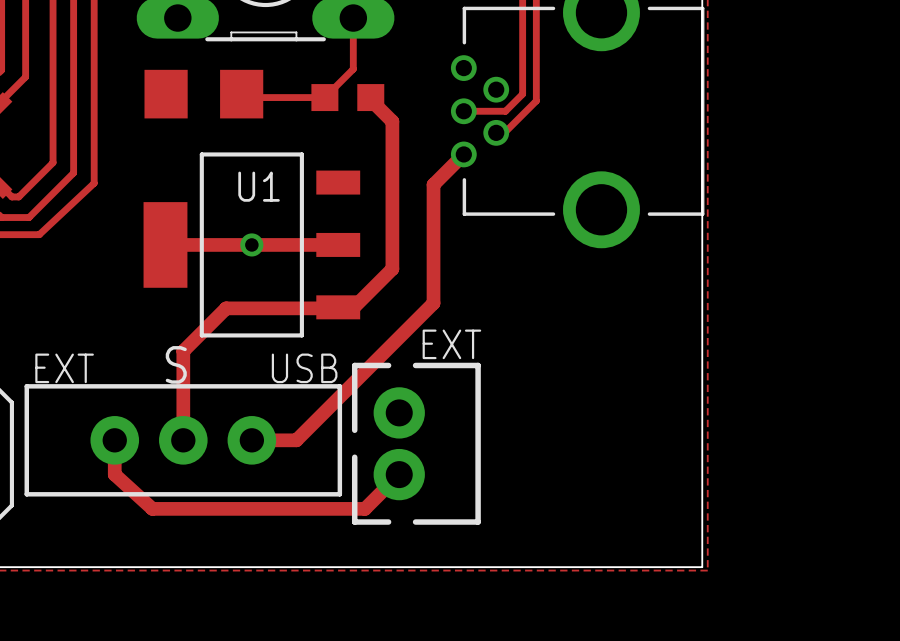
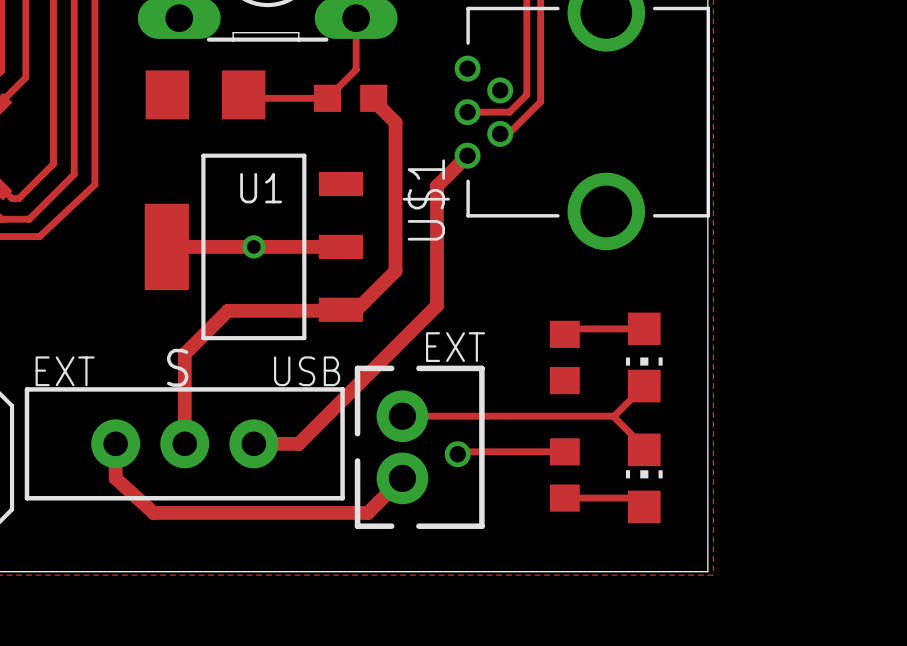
U$1 name: none -> U$1 (426, 199)
track: none -> (644, 328) (573, 328) (564, 334)
part: none -> (564, 357)
part: none -> (644, 357)
track: none -> (644, 386) (614, 416) (402, 416)
track: none -> (613, 416) (644, 447) (644, 449)
track: none -> (564, 451) (458, 451) (457, 454)
via: none -> (457, 454)
part: none -> (564, 474)
part: none -> (644, 478)
track: none -> (564, 498) (635, 498) (644, 506)

